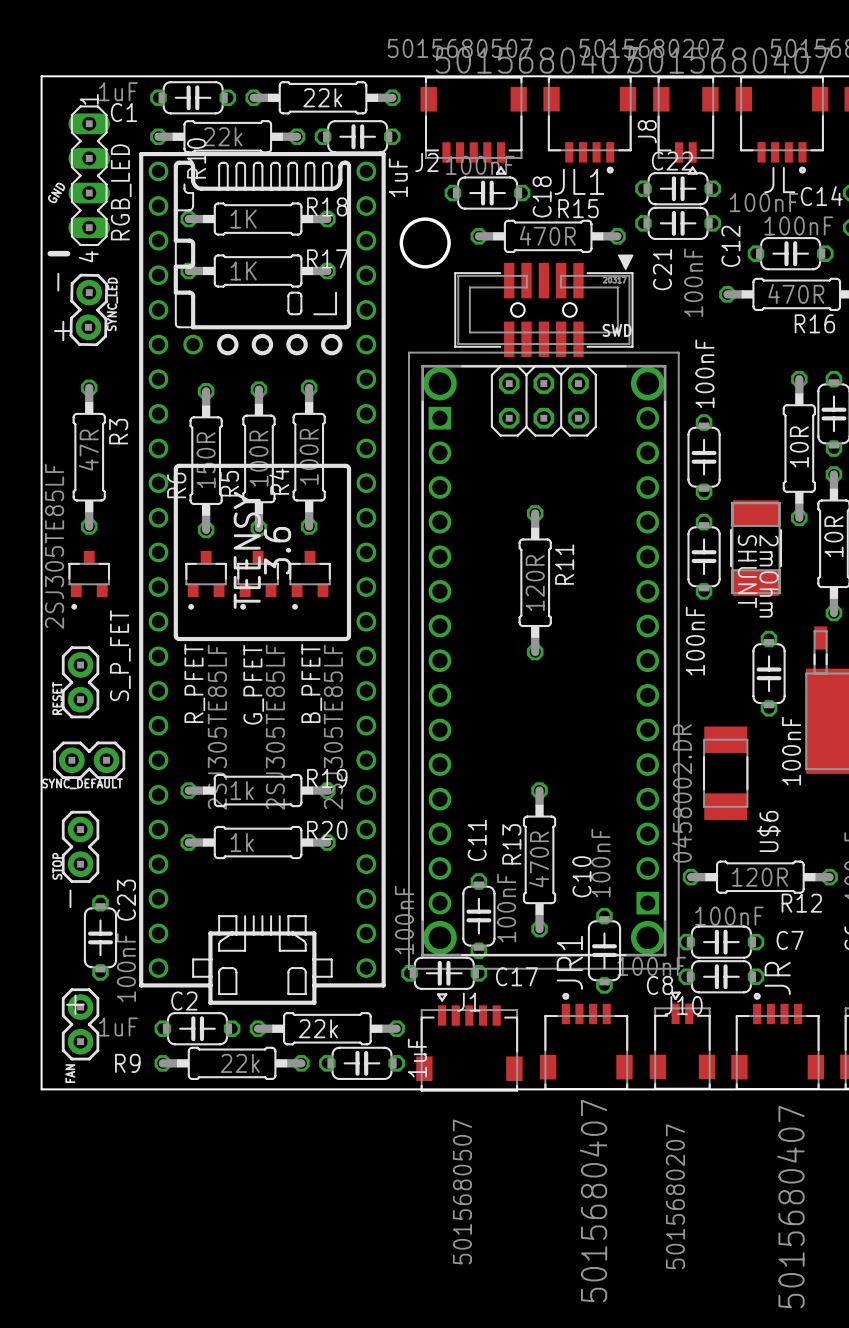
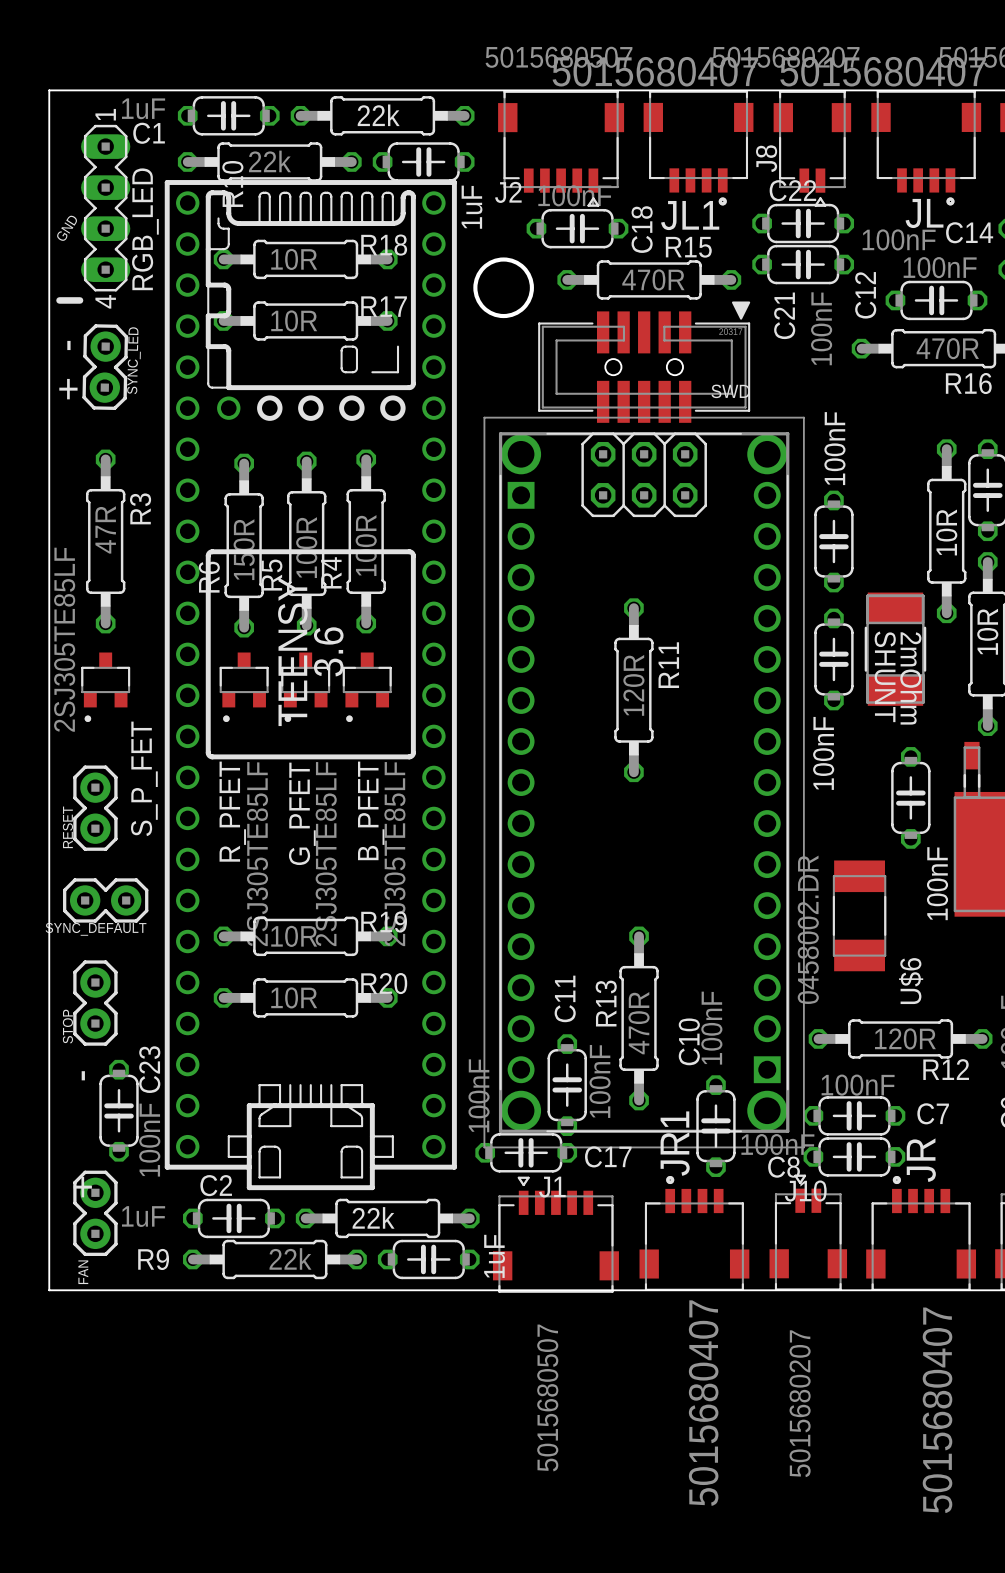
R18 value: 1K (243, 219) -> 10R (294, 259)
R17 value: 1K (243, 270) -> 10R (294, 320)
R19 value: 1k (242, 790) -> 10R (294, 936)
R20 value: 1k (242, 842) -> 10R (294, 997)

